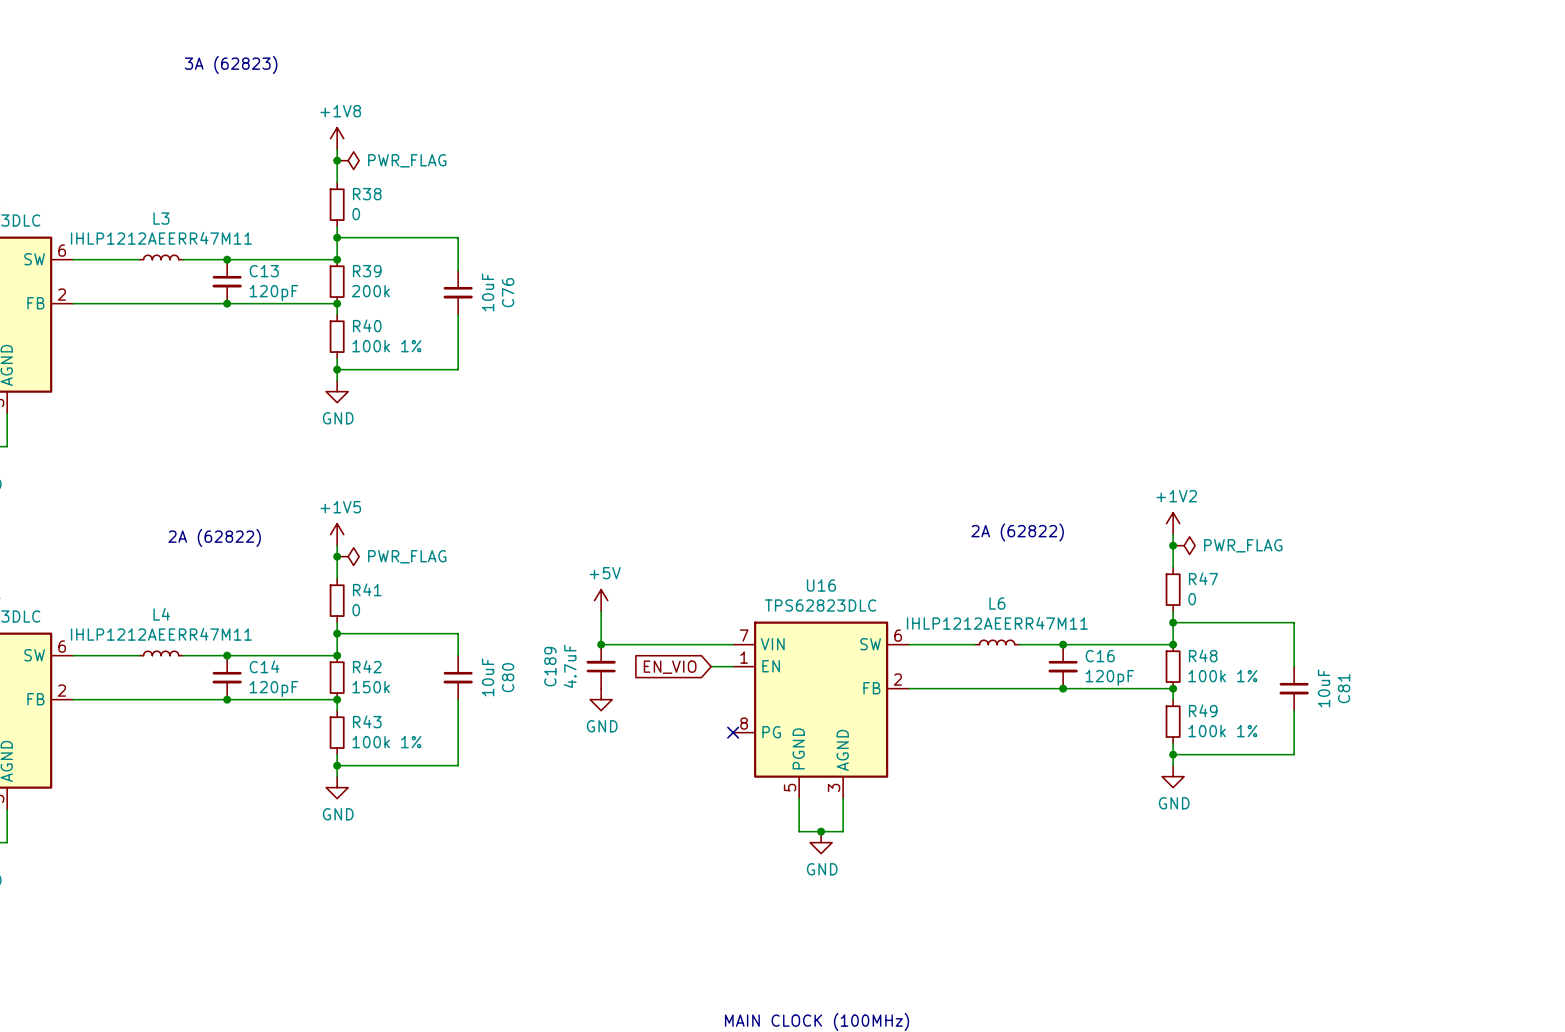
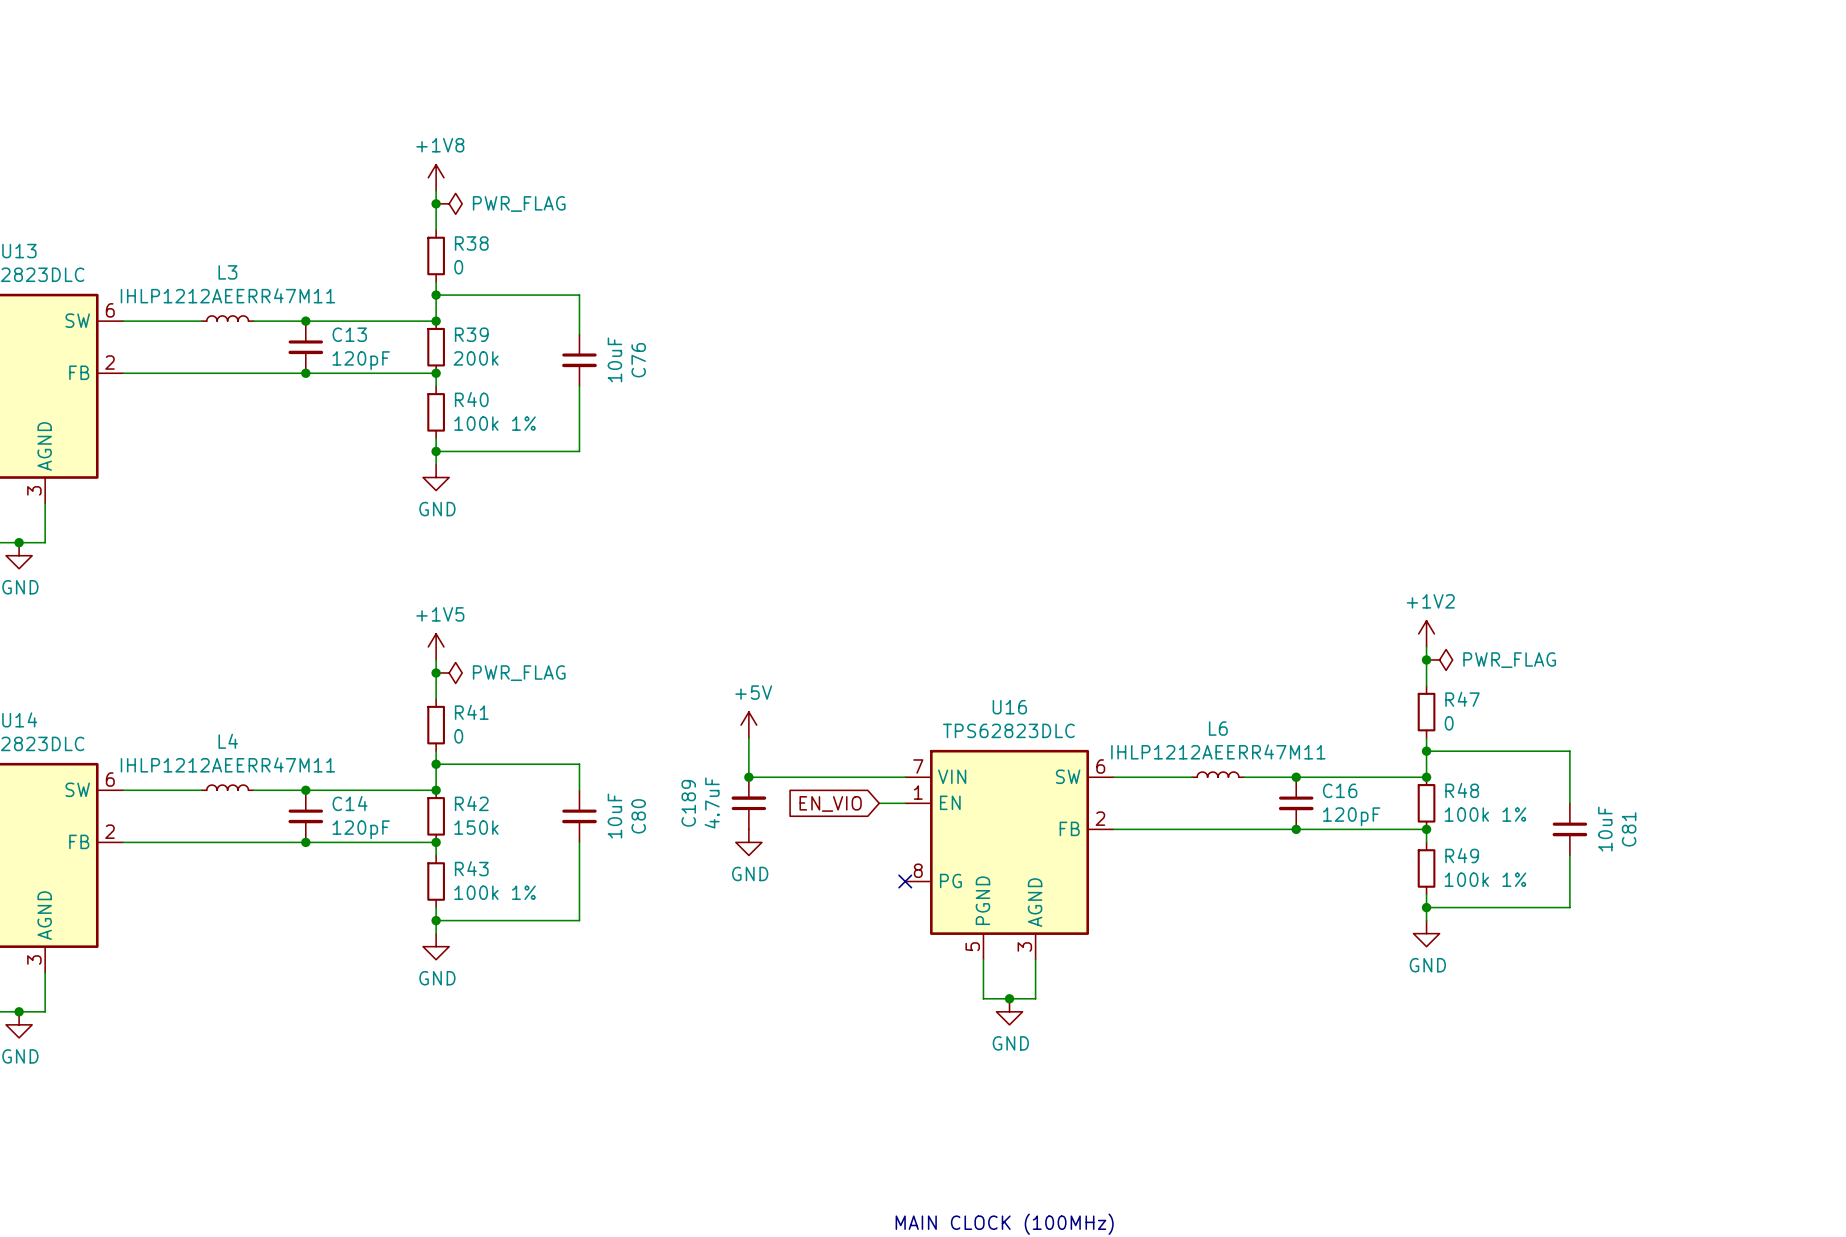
text: 3A (62823) (231, 64) -> none
text: 2A (62822) (1017, 532) -> none
text: 2A (62822) (214, 537) -> none

